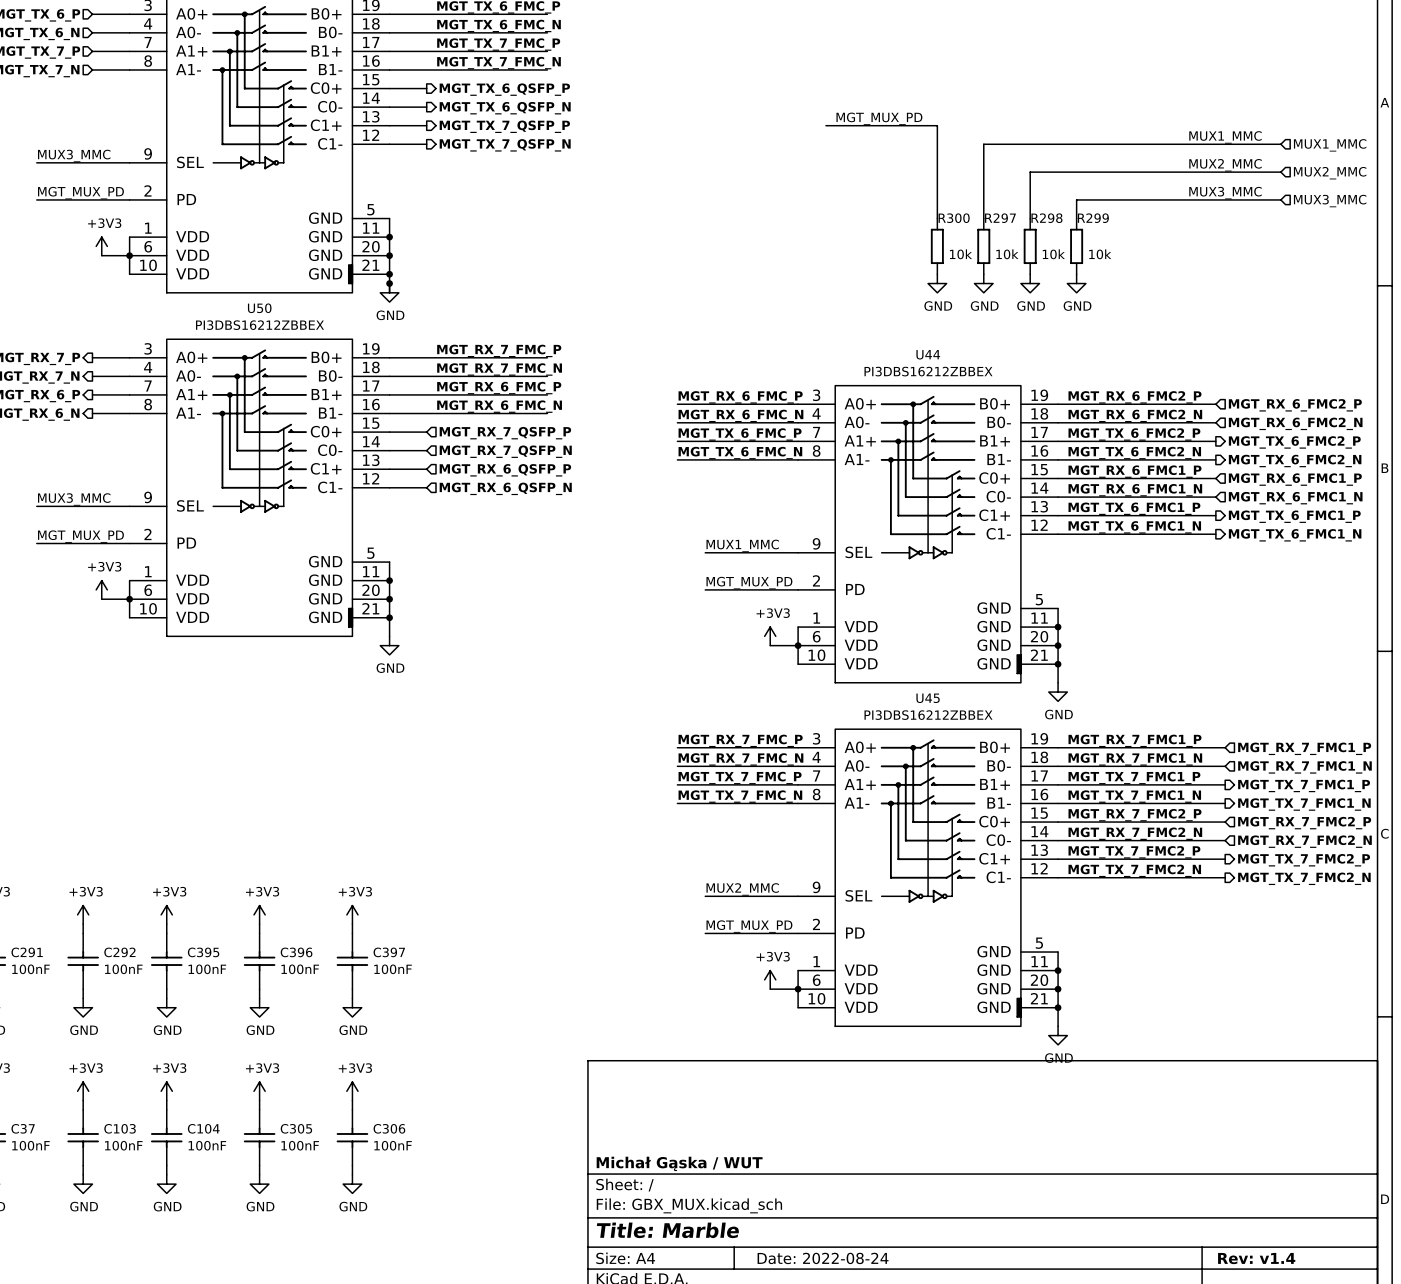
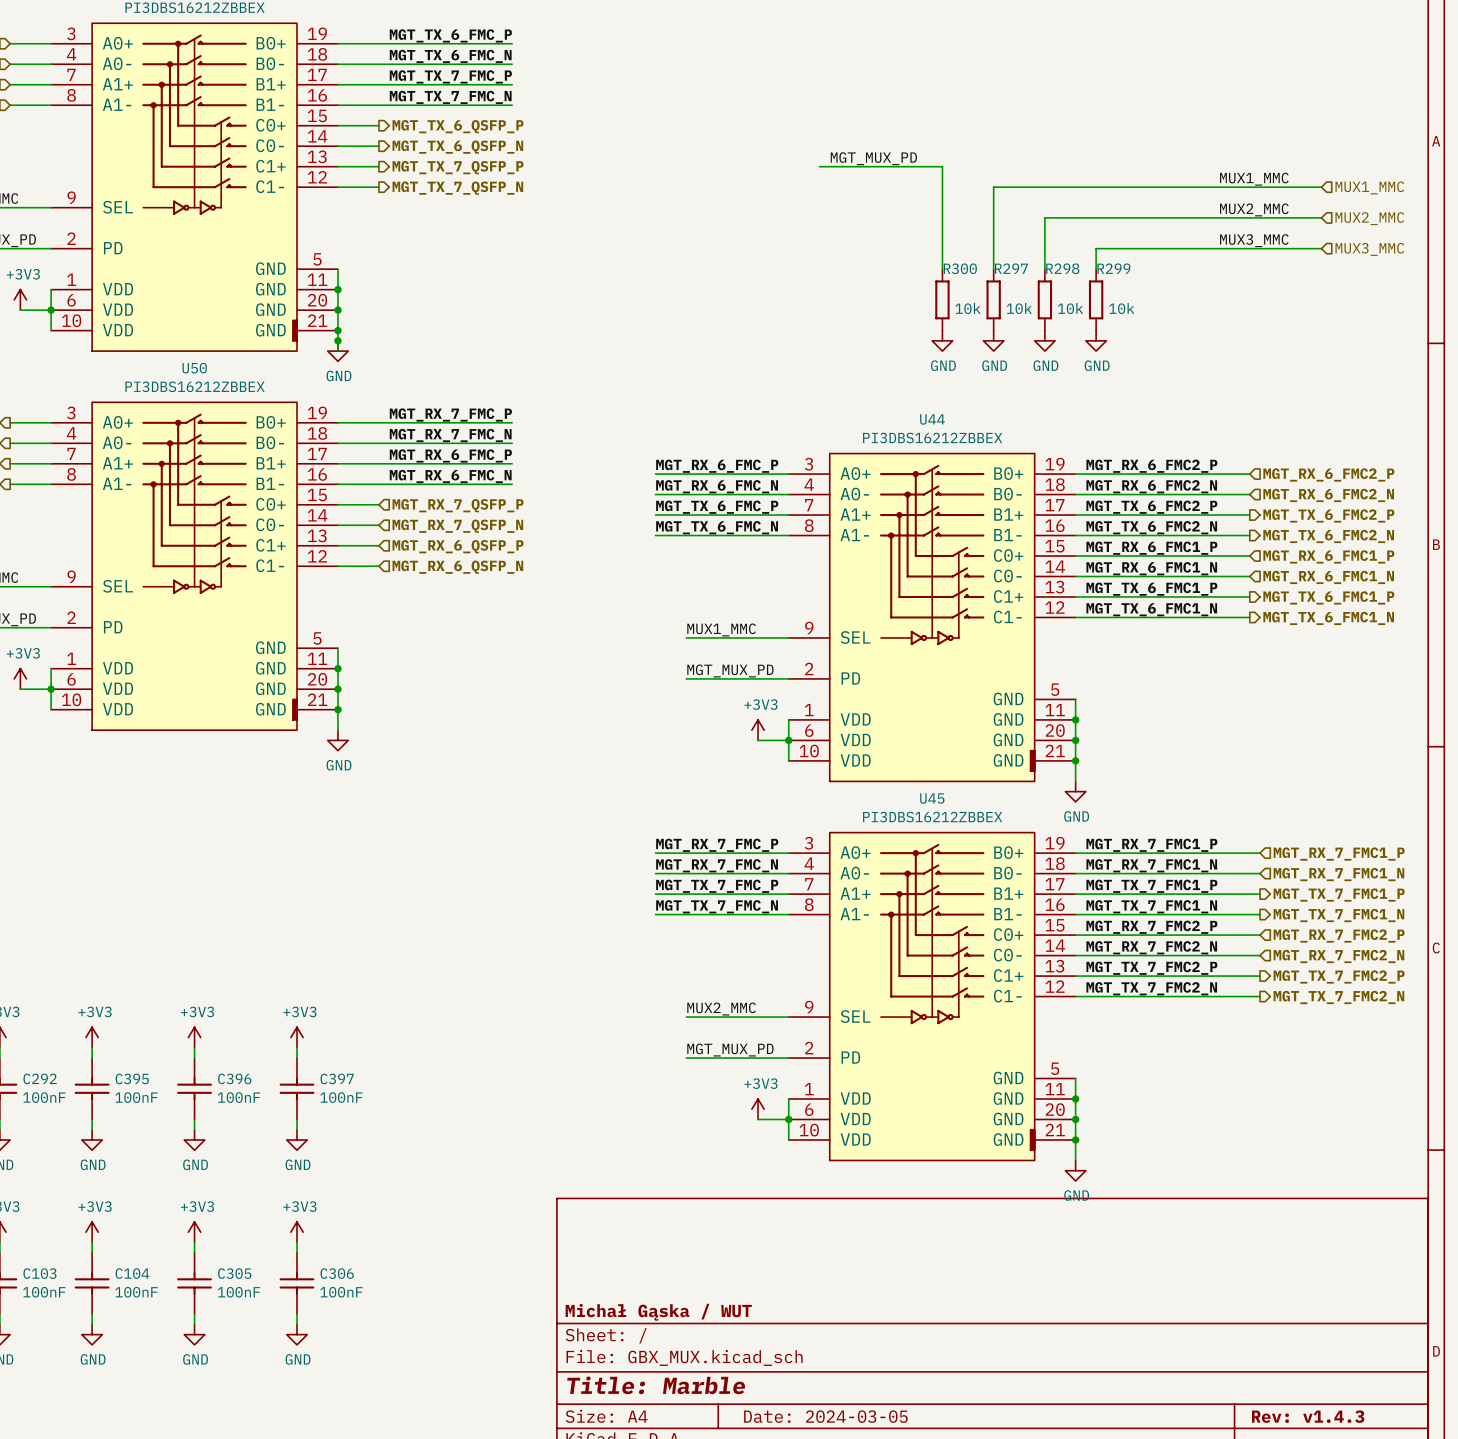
title block: Date: 2022-08-24 (823, 1258) -> Date: 2024-03-05 (825, 1416)
title block: Rev: v1.4 (1256, 1258) -> Rev: v1.4.3 (1308, 1416)

